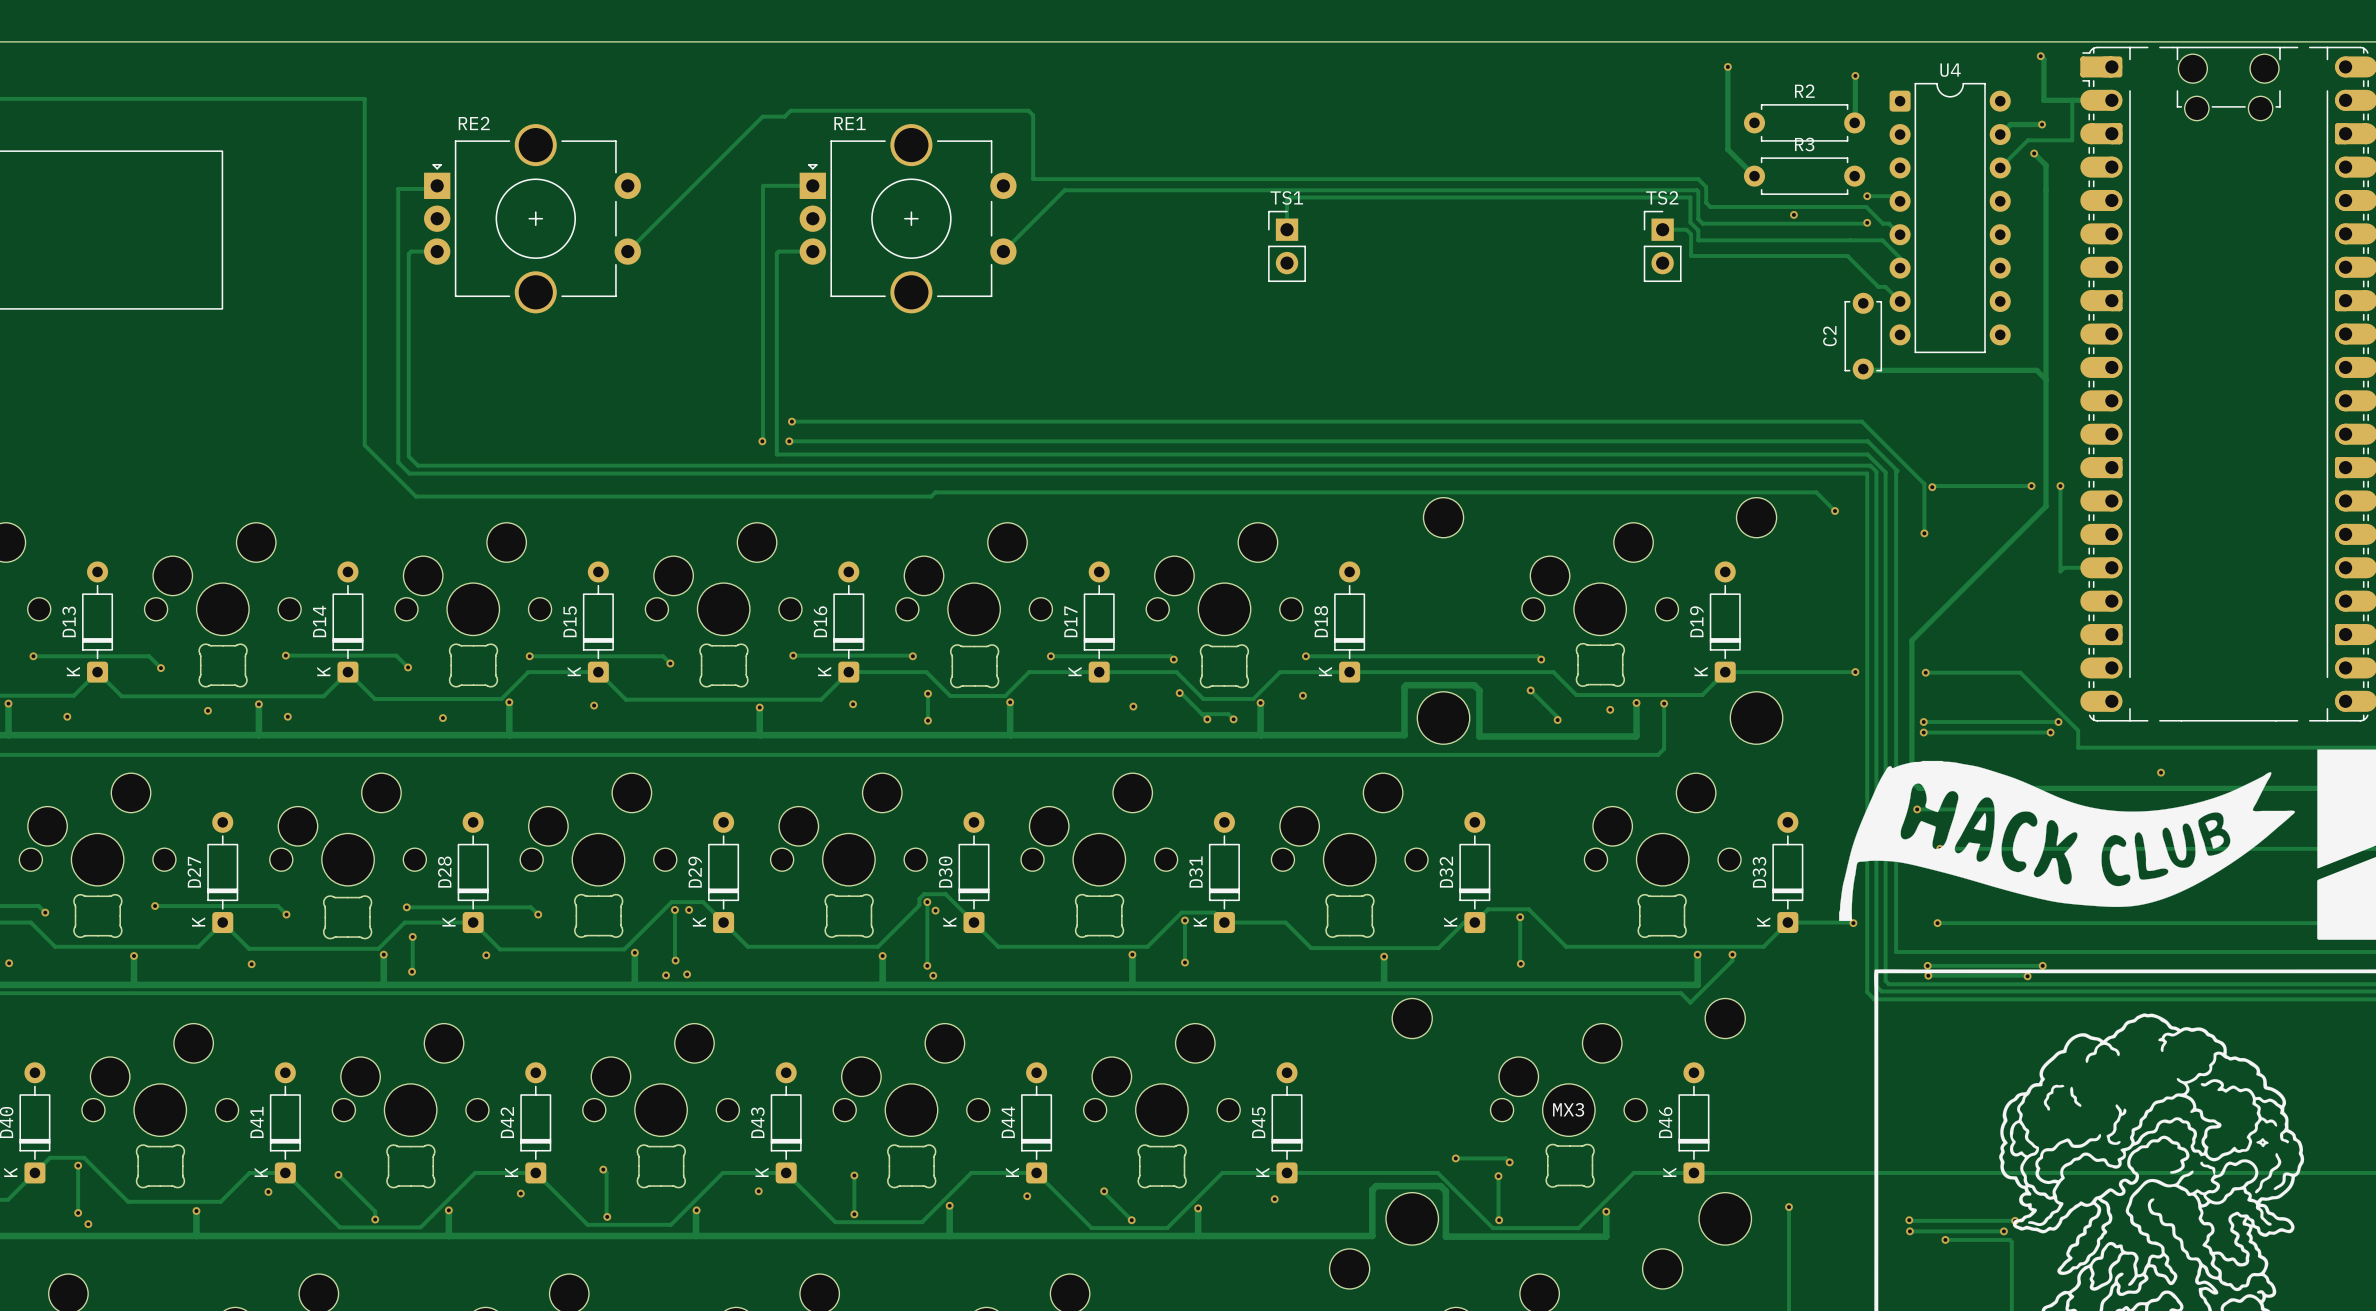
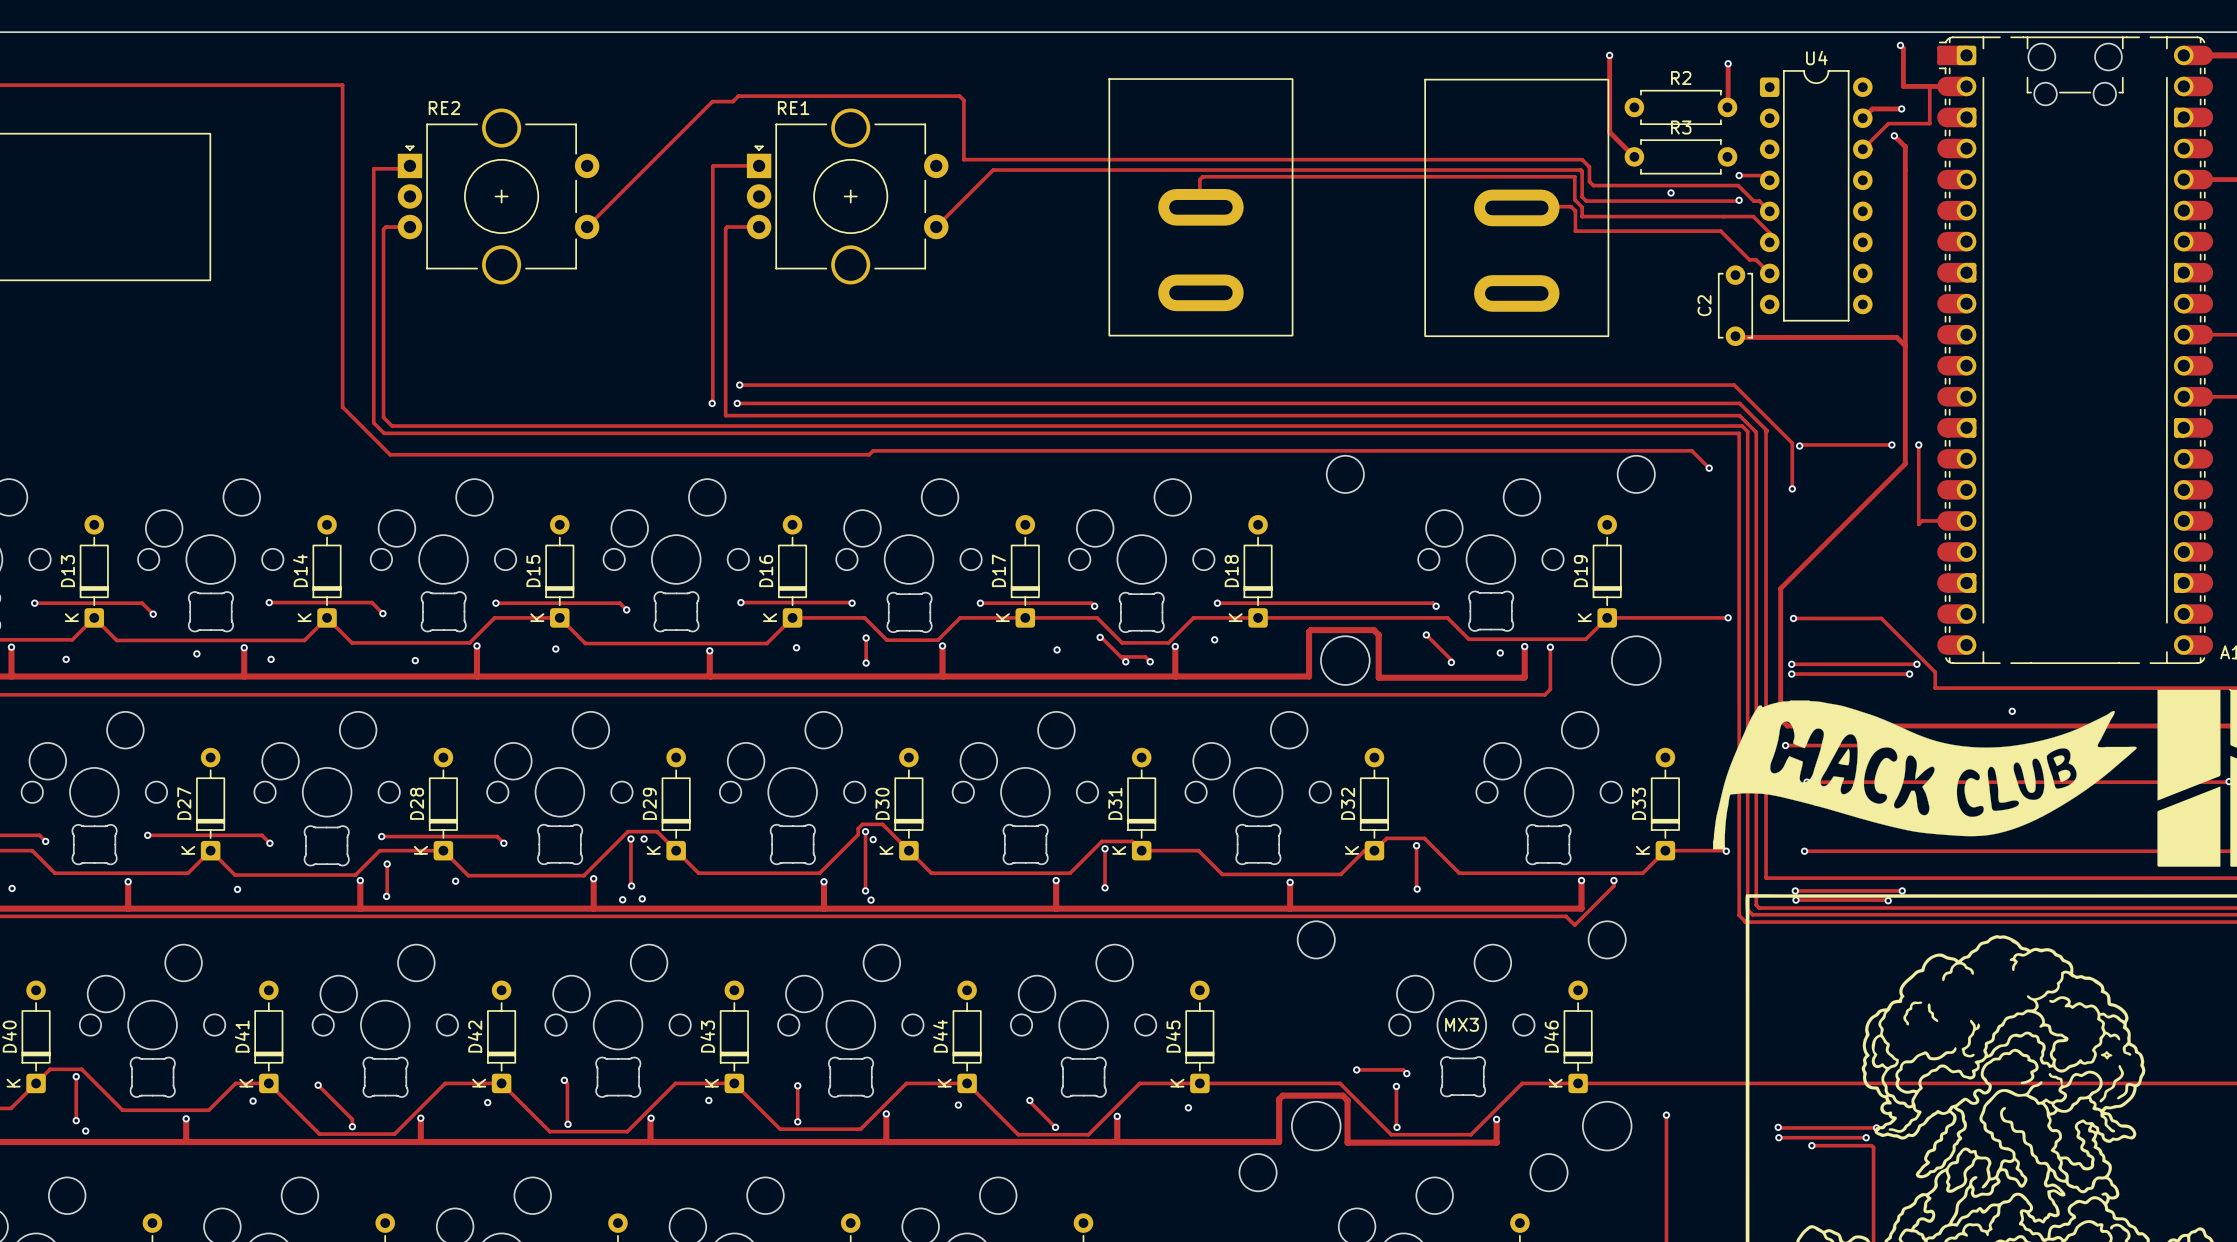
part: none -> (1200, 207)
part: none -> (1516, 207)
TS1: (1287, 246) -> none
TS2: (1662, 246) -> none

